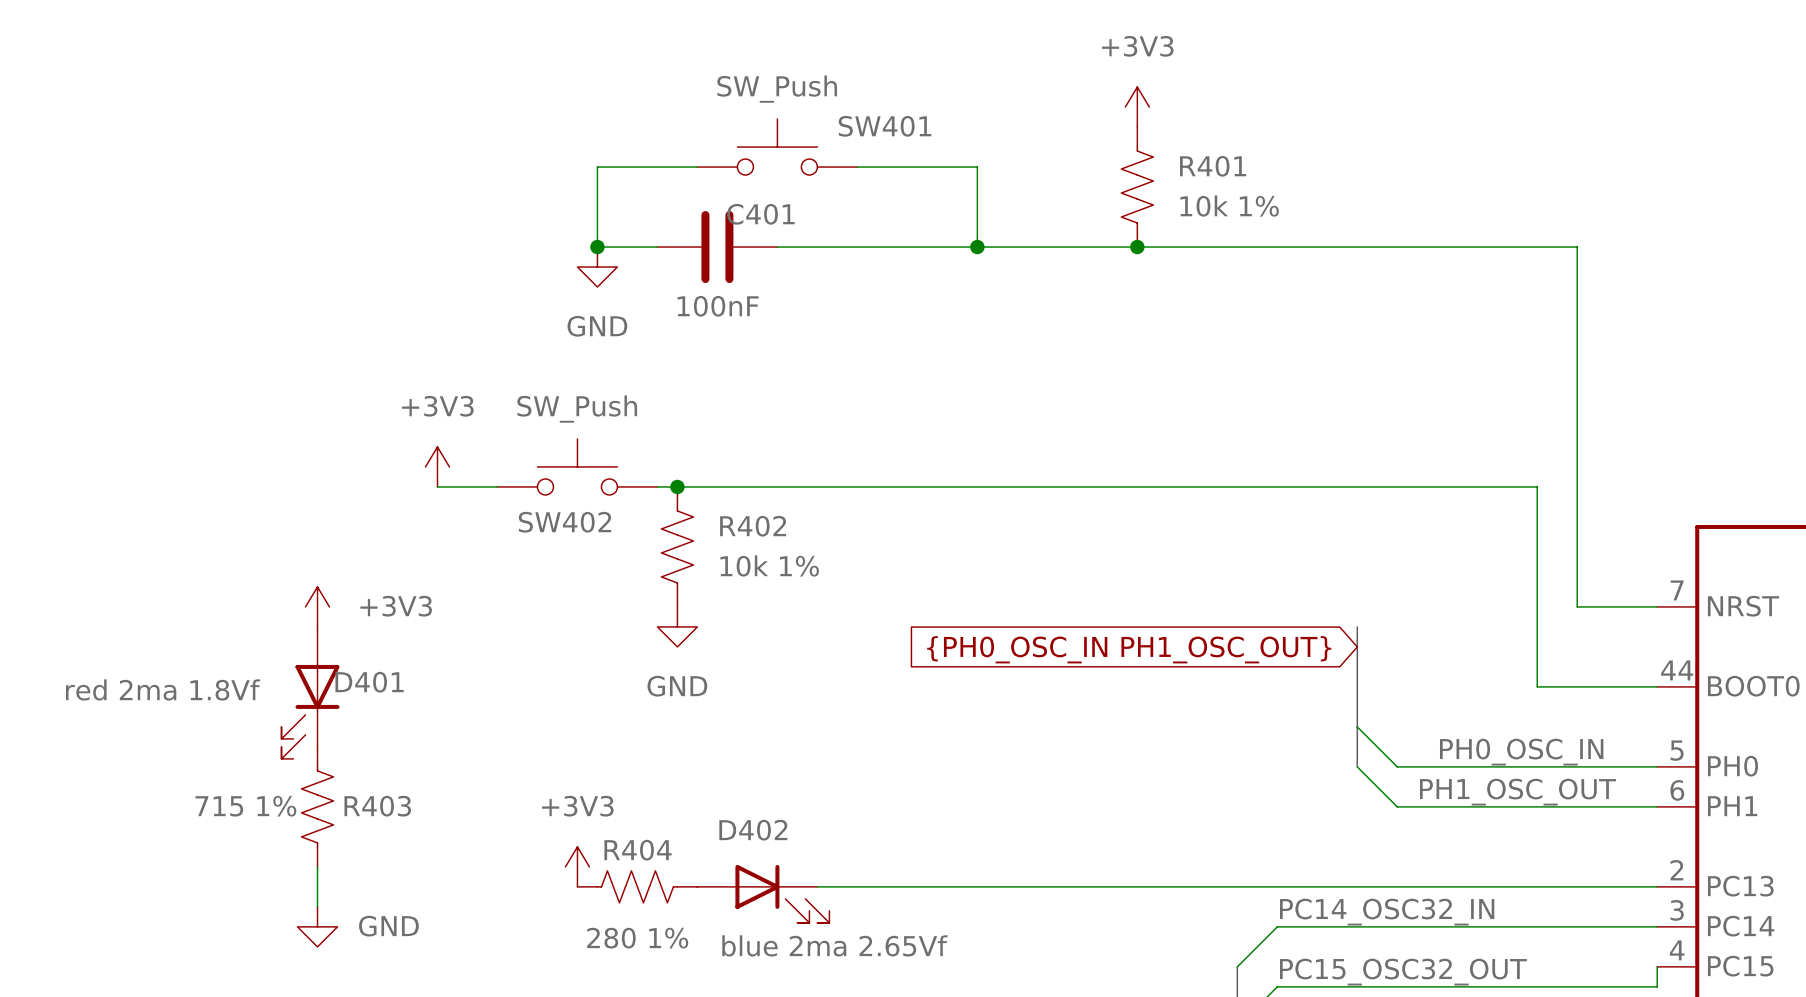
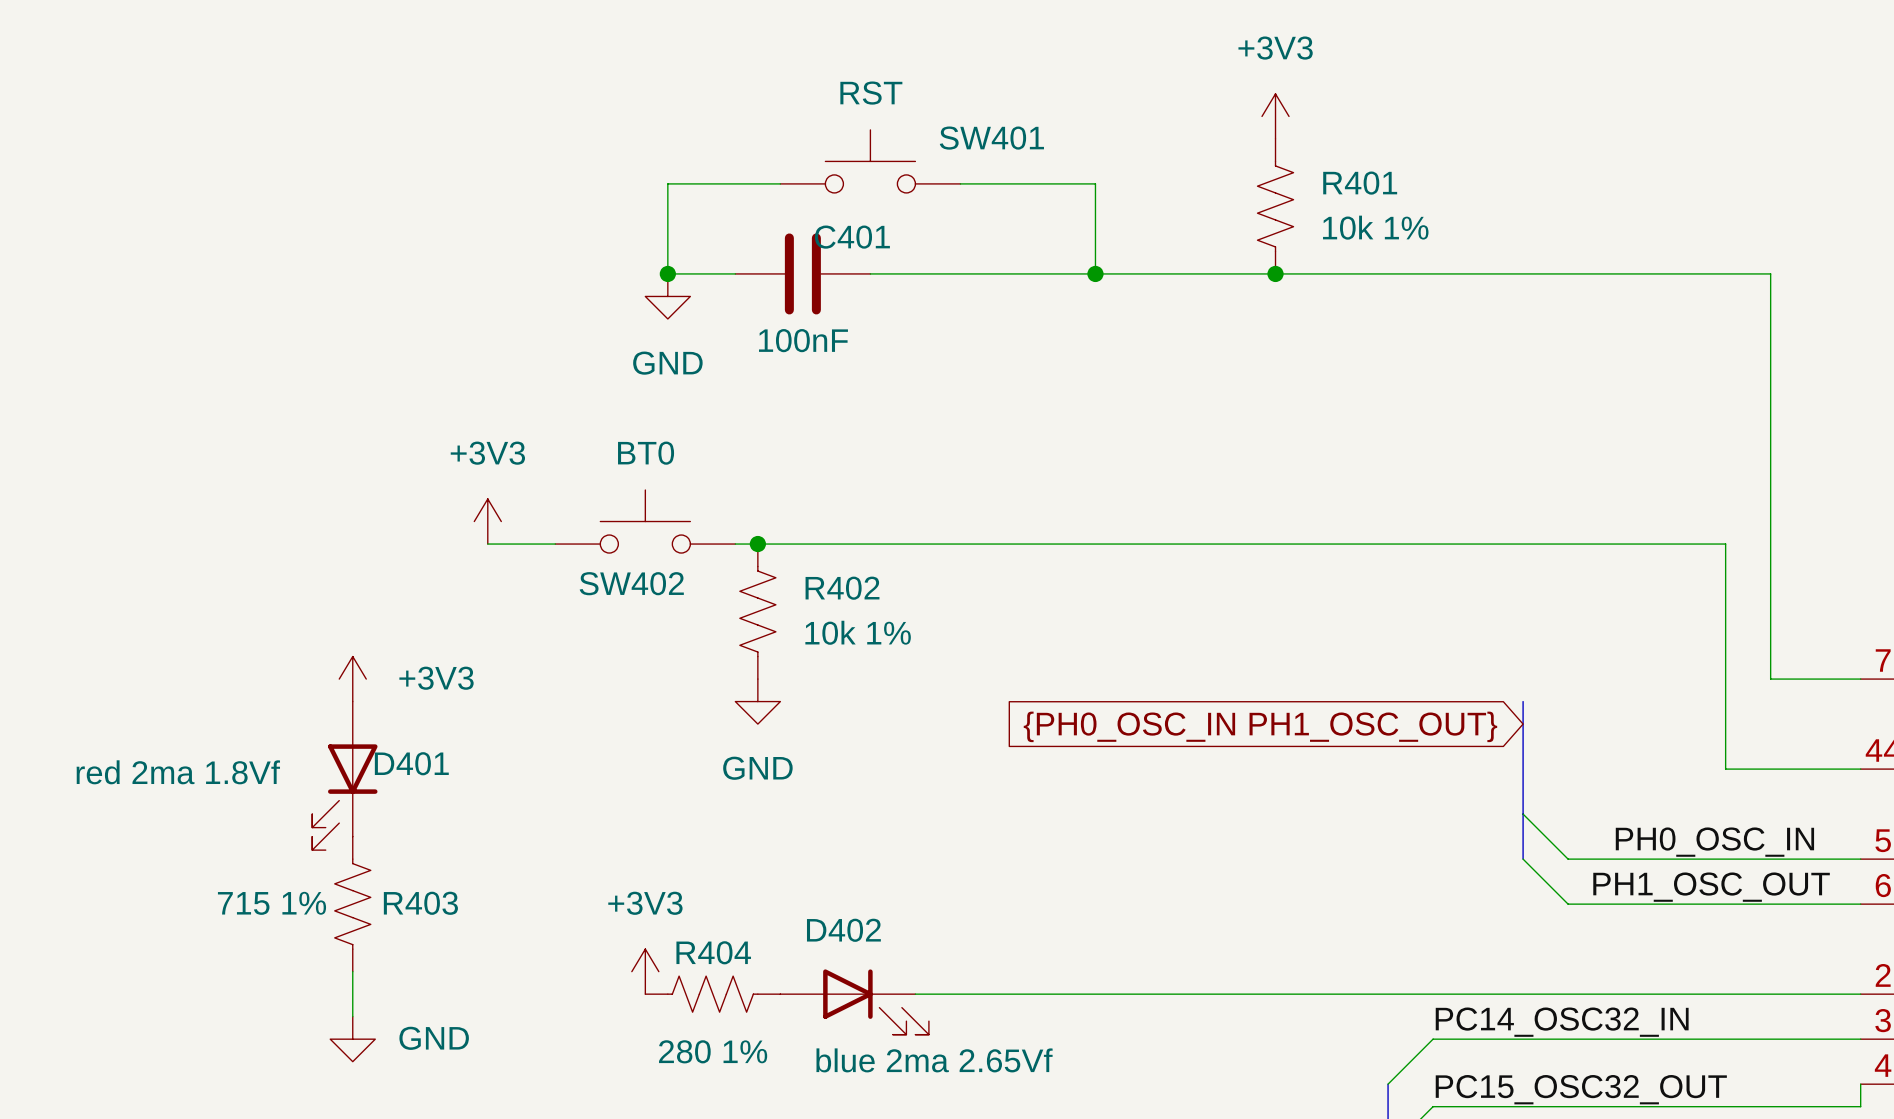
SW401 value: SW_Push (777, 89) -> RST (871, 93)
SW402 value: SW_Push (577, 409) -> BT0 (646, 453)

